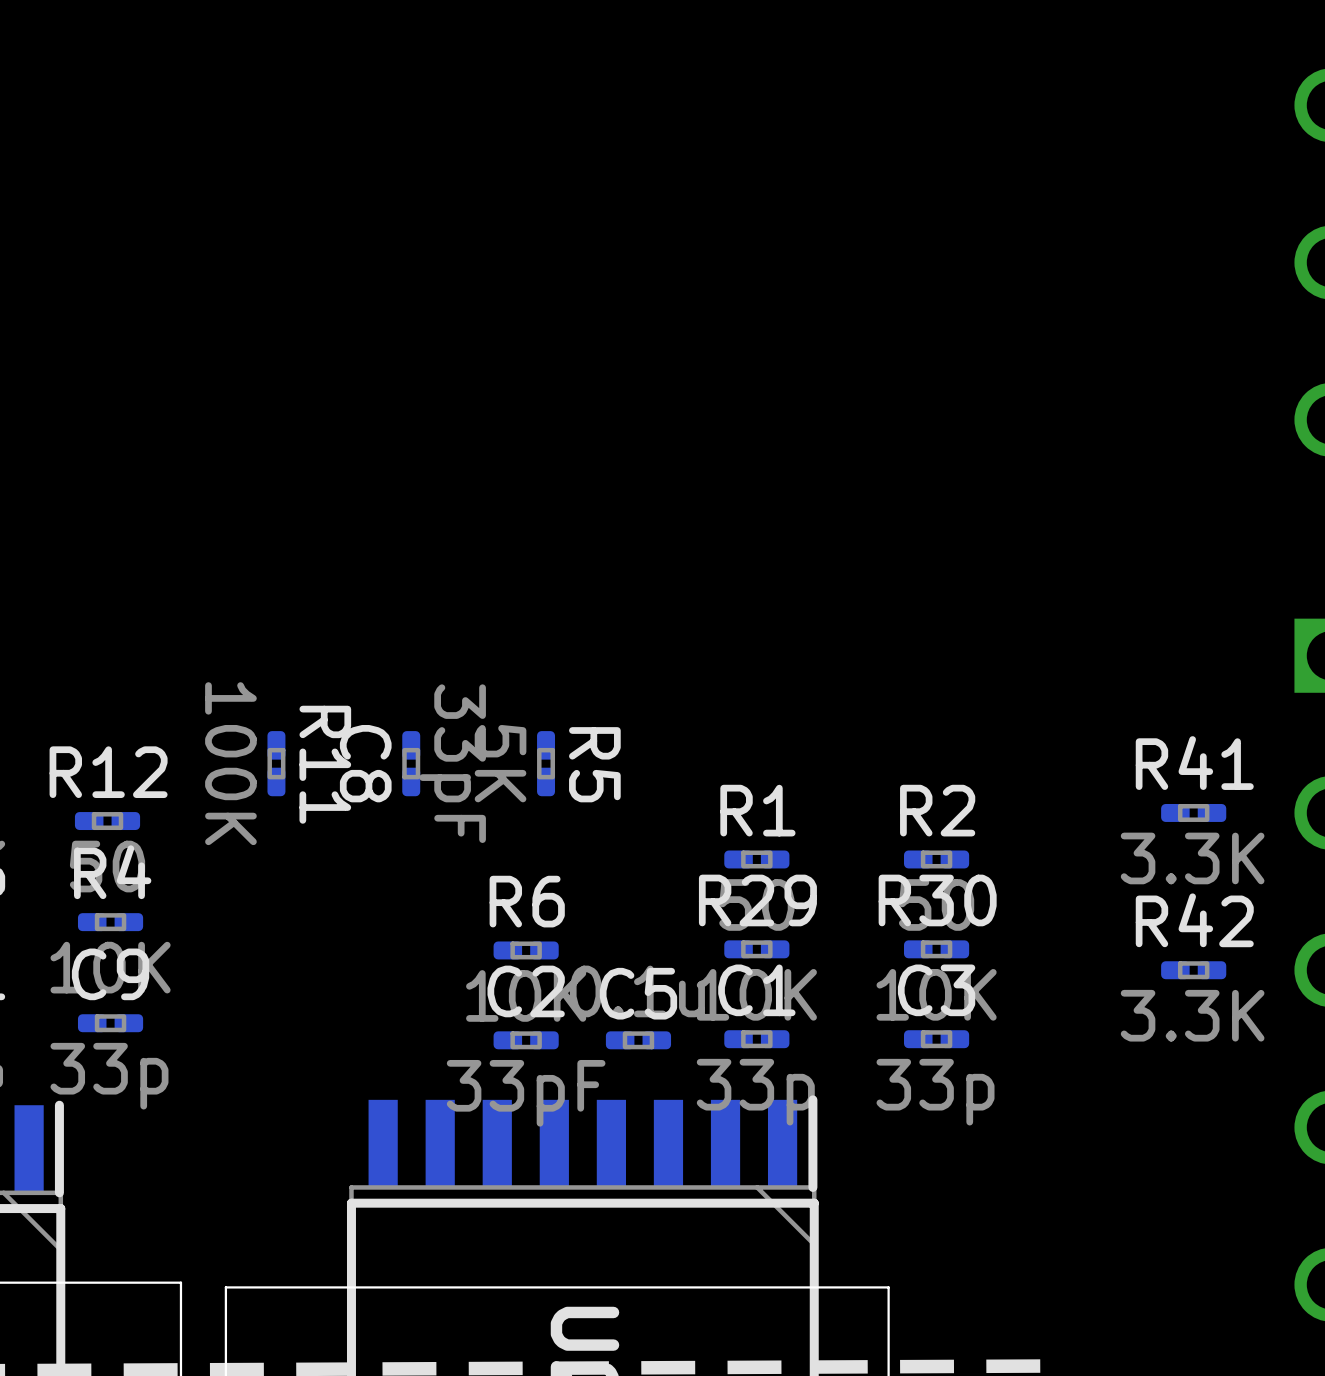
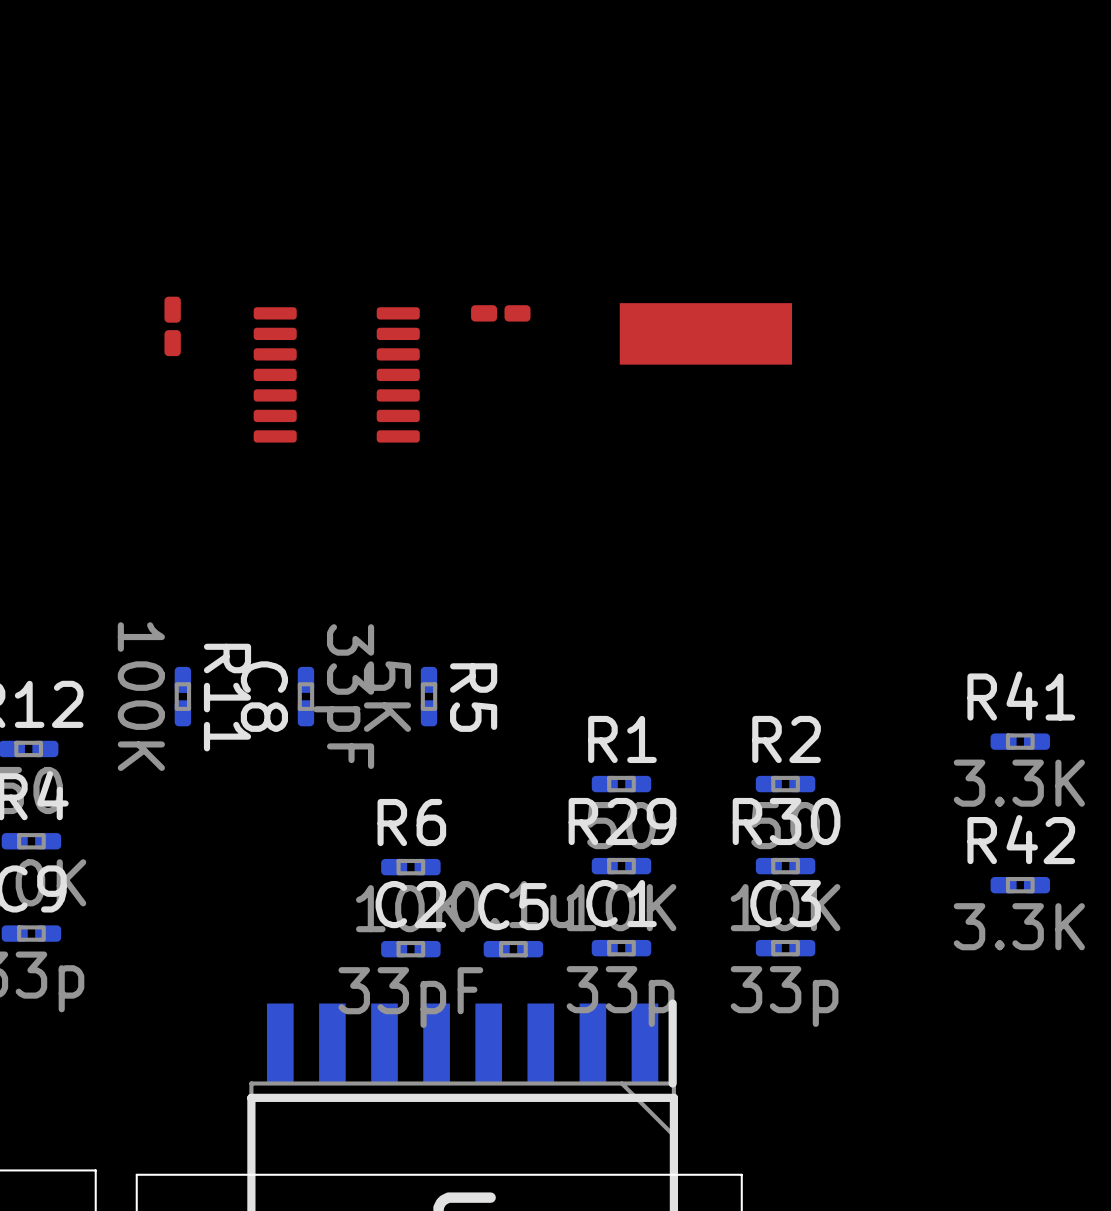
part: none -> (500, 313)
part: none -> (172, 326)
part: none -> (705, 333)
part: none -> (336, 374)

